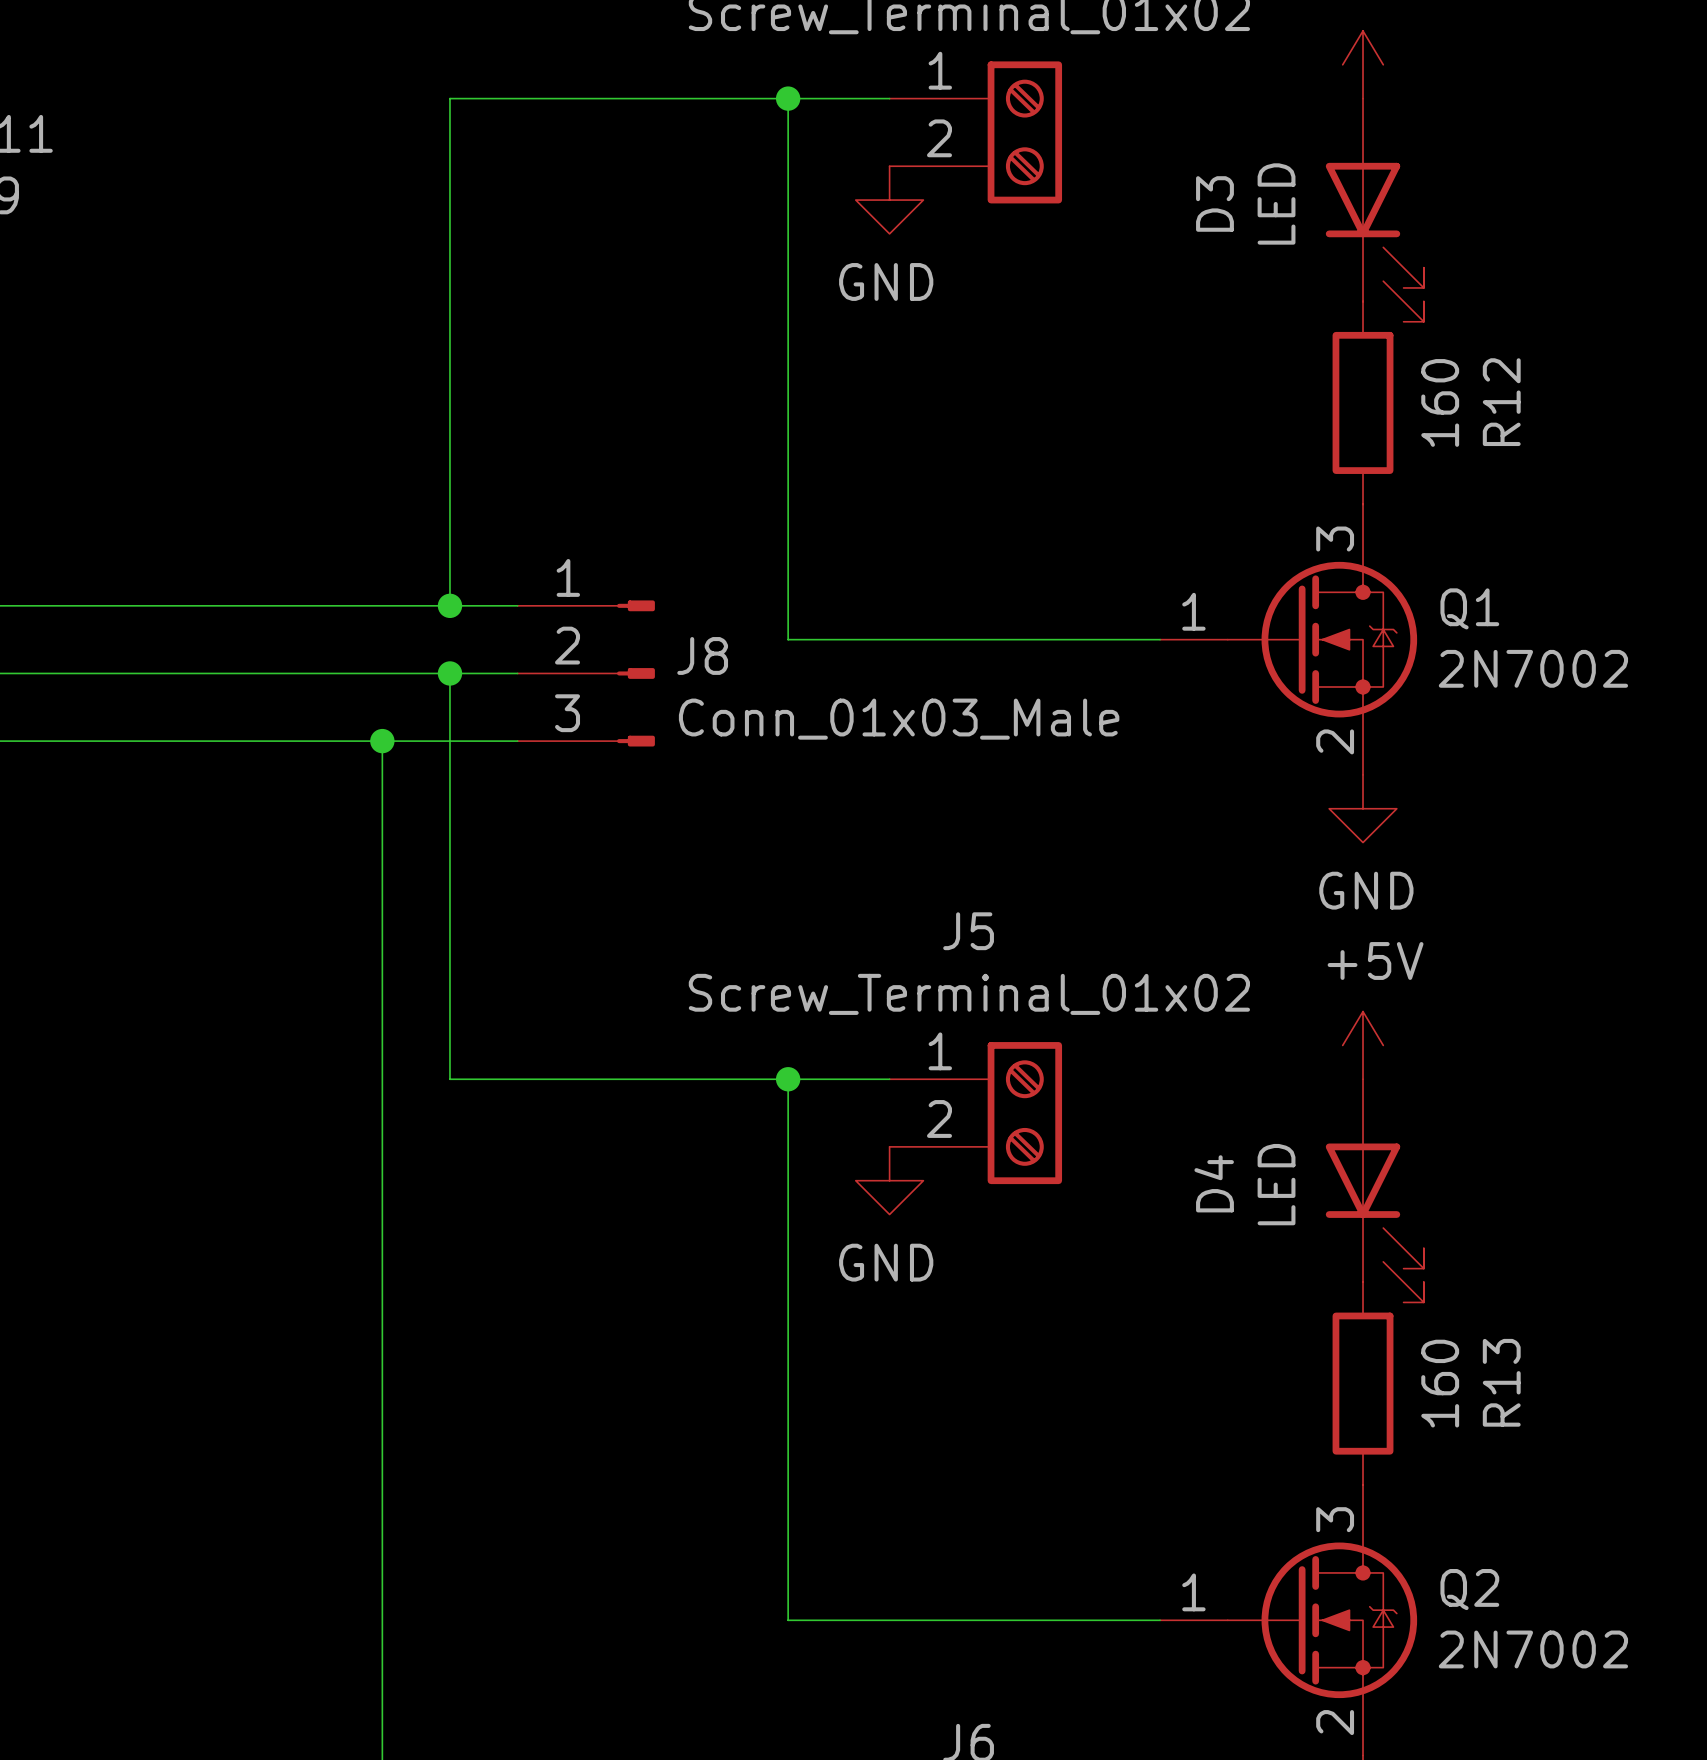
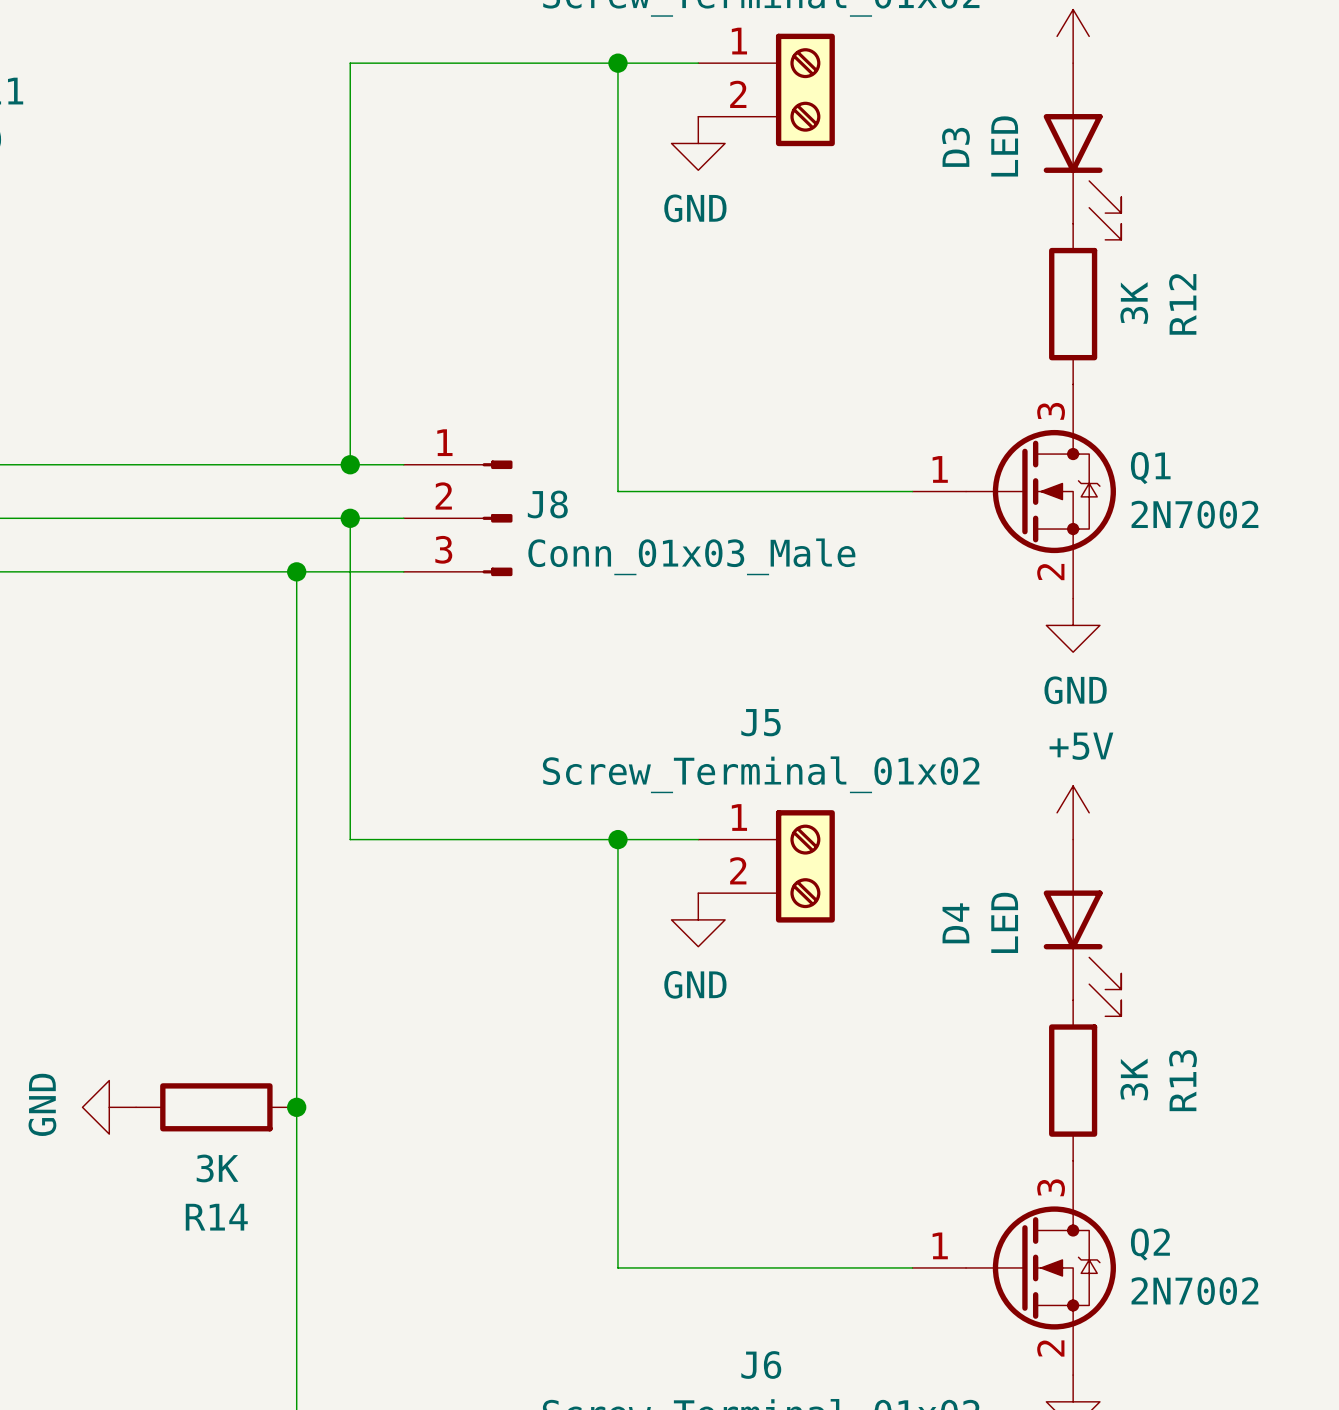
R12 value: 160 (1440, 402) -> 3K (1134, 302)
R13 value: 160 (1440, 1383) -> 3K (1134, 1079)
power symbol: none -> GND (109, 1107)
R14: none -> 3K (216, 1107)
junction: none -> (296, 1107)

